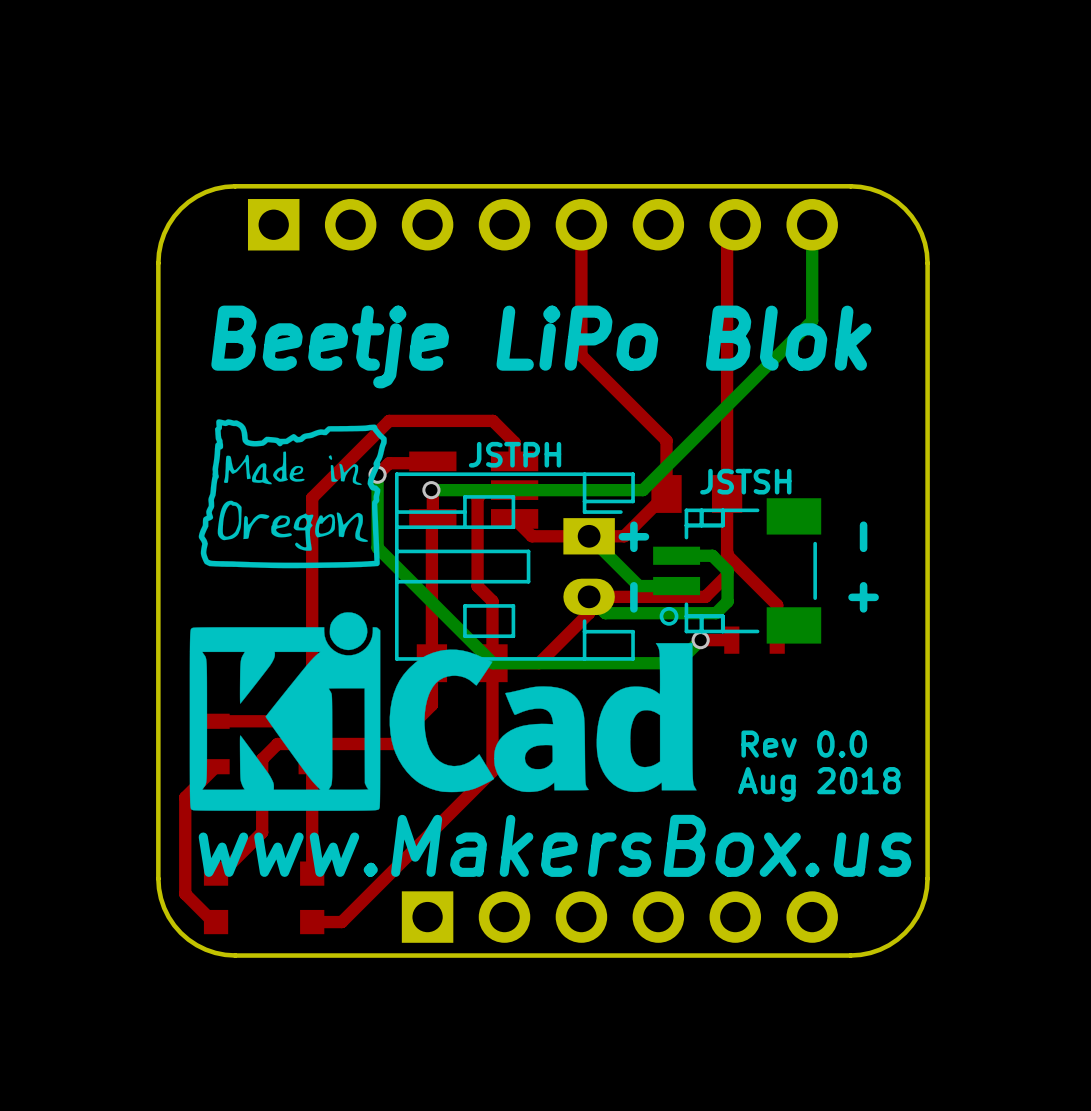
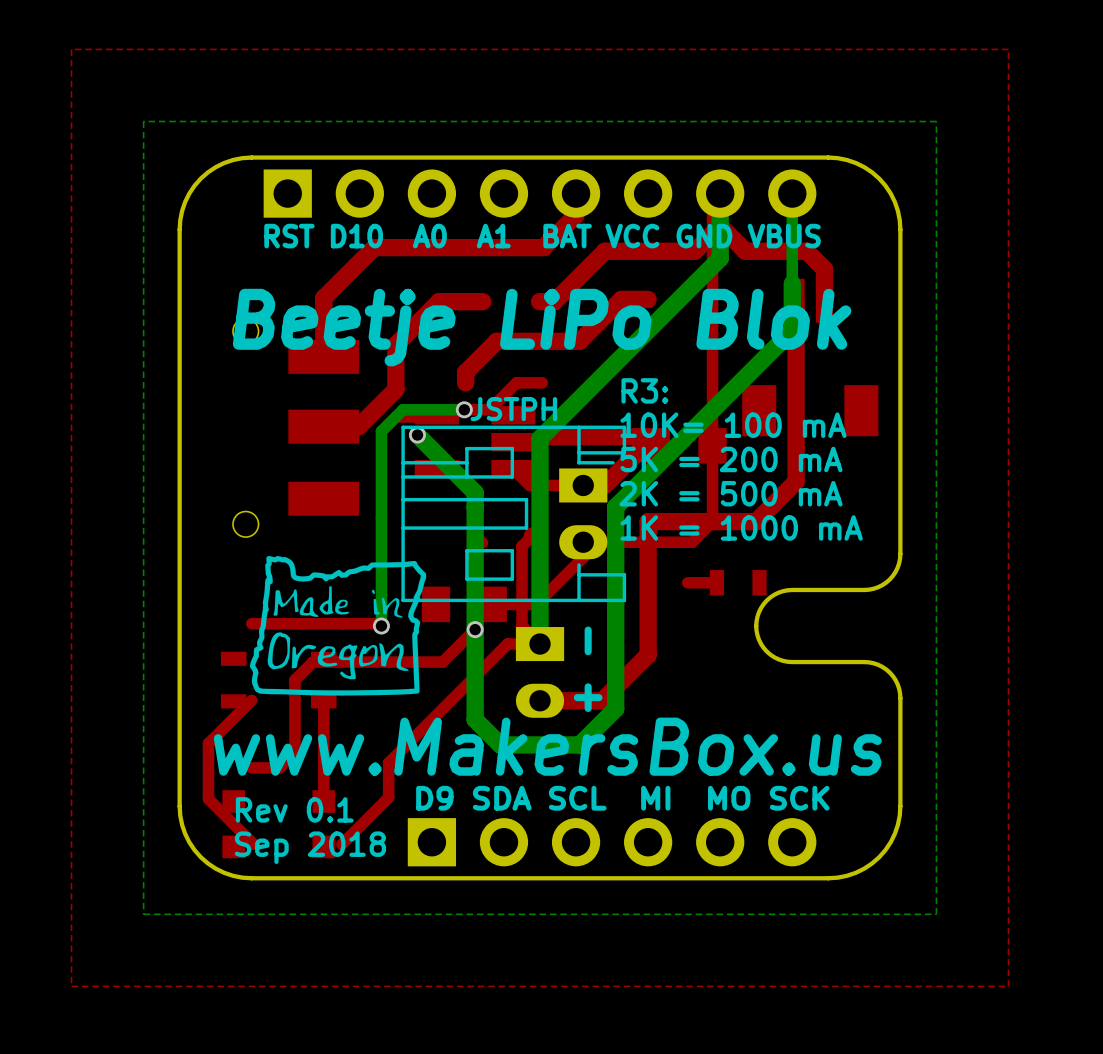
top zone outline: none -> (1008, 49) (1008, 986) (71, 986) (71, 49) (1008, 49)
bottom zone outline: none -> (936, 121) (936, 914) (143, 914) (143, 121) (936, 121)
bottom track: none -> (720, 193) (720, 258) (540, 438) (540, 644)
top track: (581, 247) (581, 355) (666, 440) (666, 493) (624, 536) (612, 536) -> (542, 436) (642, 436) (648, 442) (604, 485)
top track: none -> (576, 215) (543, 247) (374, 247) (323, 298) (323, 356)
text: none -> RST D10 A0 A1 BAT VCC GND VBUS (542, 236)
bottom track: (812, 320) (642, 490) (431, 490) -> (792, 283) (792, 330) (615, 507) (615, 708) (579, 744) (500, 744) (475, 719) (475, 492) (417, 435)
top track: none -> (648, 299) (621, 299) (579, 341) (496, 341) (465, 372) (465, 382)
top track: none -> (796, 300) (796, 481) (756, 521) (648, 521) (648, 654) (602, 700) (540, 700)
top track: none -> (824, 300) (824, 269) (806, 251) (745, 251) (720, 226) (694, 251) (604, 251) (554, 301) (539, 301)
top track: none -> (482, 301) (439, 301) (395, 344) (395, 389) (358, 426) (323, 426)
text position: Beetje LiPo Blok (541, 346) -> Beetje LiPo Blok (542, 327)
top track: none -> (542, 382) (516, 382) (489, 409) (464, 409)
text: none -> R3: (644, 390)
bottom track: none -> (464, 409) (403, 409) (381, 431) (381, 626)
via: none -> (464, 409)
top track: (514, 461) (514, 442) (492, 420) (389, 420) (312, 497) (312, 721) (216, 721) -> none
text: none -> 10K= 100 mA (733, 425)
part: none -> (296, 427)
bottom track: (377, 474) (377, 547) (492, 663) (677, 663) (700, 640) -> none
via: (377, 474) -> none
via: none -> (417, 435)
top track: (431, 490) (431, 705) (392, 743) (277, 743) (262, 759) (262, 832) (221, 873) (216, 873) -> none
via: (431, 490) -> none
top track: (514, 490) (485, 490) (477, 497) (477, 586) (492, 601) (492, 771) (341, 922) (312, 922) -> none
drawing position: (292, 493) -> (338, 625)
text: none -> 5K = 200 mA (731, 459)
bottom track: (589, 536) (638, 586) (676, 586) -> none
text: none -> 2K = 500 mA (730, 493)
bottom track: (676, 555) (712, 555) (727, 570) (727, 601) (716, 613) (605, 613) (589, 596) -> none
top track: (727, 555) (777, 605) (777, 640) -> none
text: - + (633, 567) -> none
text: - + (863, 567) -> none
part side: bottom (737, 570) -> top (810, 357)
text: none -> 1K = 1000 mA (741, 527)
top track: none -> (532, 536) (522, 546) (522, 626) (540, 644) (507, 644) (388, 762) (388, 797) (341, 844)
top track: none -> (482, 542) (475, 536) (475, 629) (442, 662) (312, 662) (294, 680) (294, 752) (279, 767) (251, 767)
board edge: (927, 609) (927, 763) -> (900, 553) (899, 563) (892, 575) (882, 585) (873, 588) (792, 589) (774, 594) (761, 608) (756, 626) (761, 644) (774, 657) (792, 662) (873, 663) (882, 666) (892, 676) (899, 688) (900, 698)
drawing: [189, 612, 697, 811] -> none
via: (700, 640) -> none
top track: none -> (251, 623) (379, 623) (381, 626)
via: none -> (381, 626)
via: none -> (475, 629)
text: none -> - + (588, 669)
part: none -> (540, 672)
text: Rev 0.0 (804, 744) -> none
top track: none -> (251, 700) (208, 743) (208, 798) (251, 842) (251, 844)
top track: (216, 766) (185, 797) (185, 893) (213, 922) (216, 922) -> none
text: Aug 2018 (819, 784) -> none
text position: www.MakersBox.us (555, 845) -> www.MakersBox.us (547, 746)
text: none -> D9 SDA SCL MI MO SCK (622, 798)
text: none -> Rev 0.1 (294, 809)
text: none -> Sep 2018 (310, 847)

